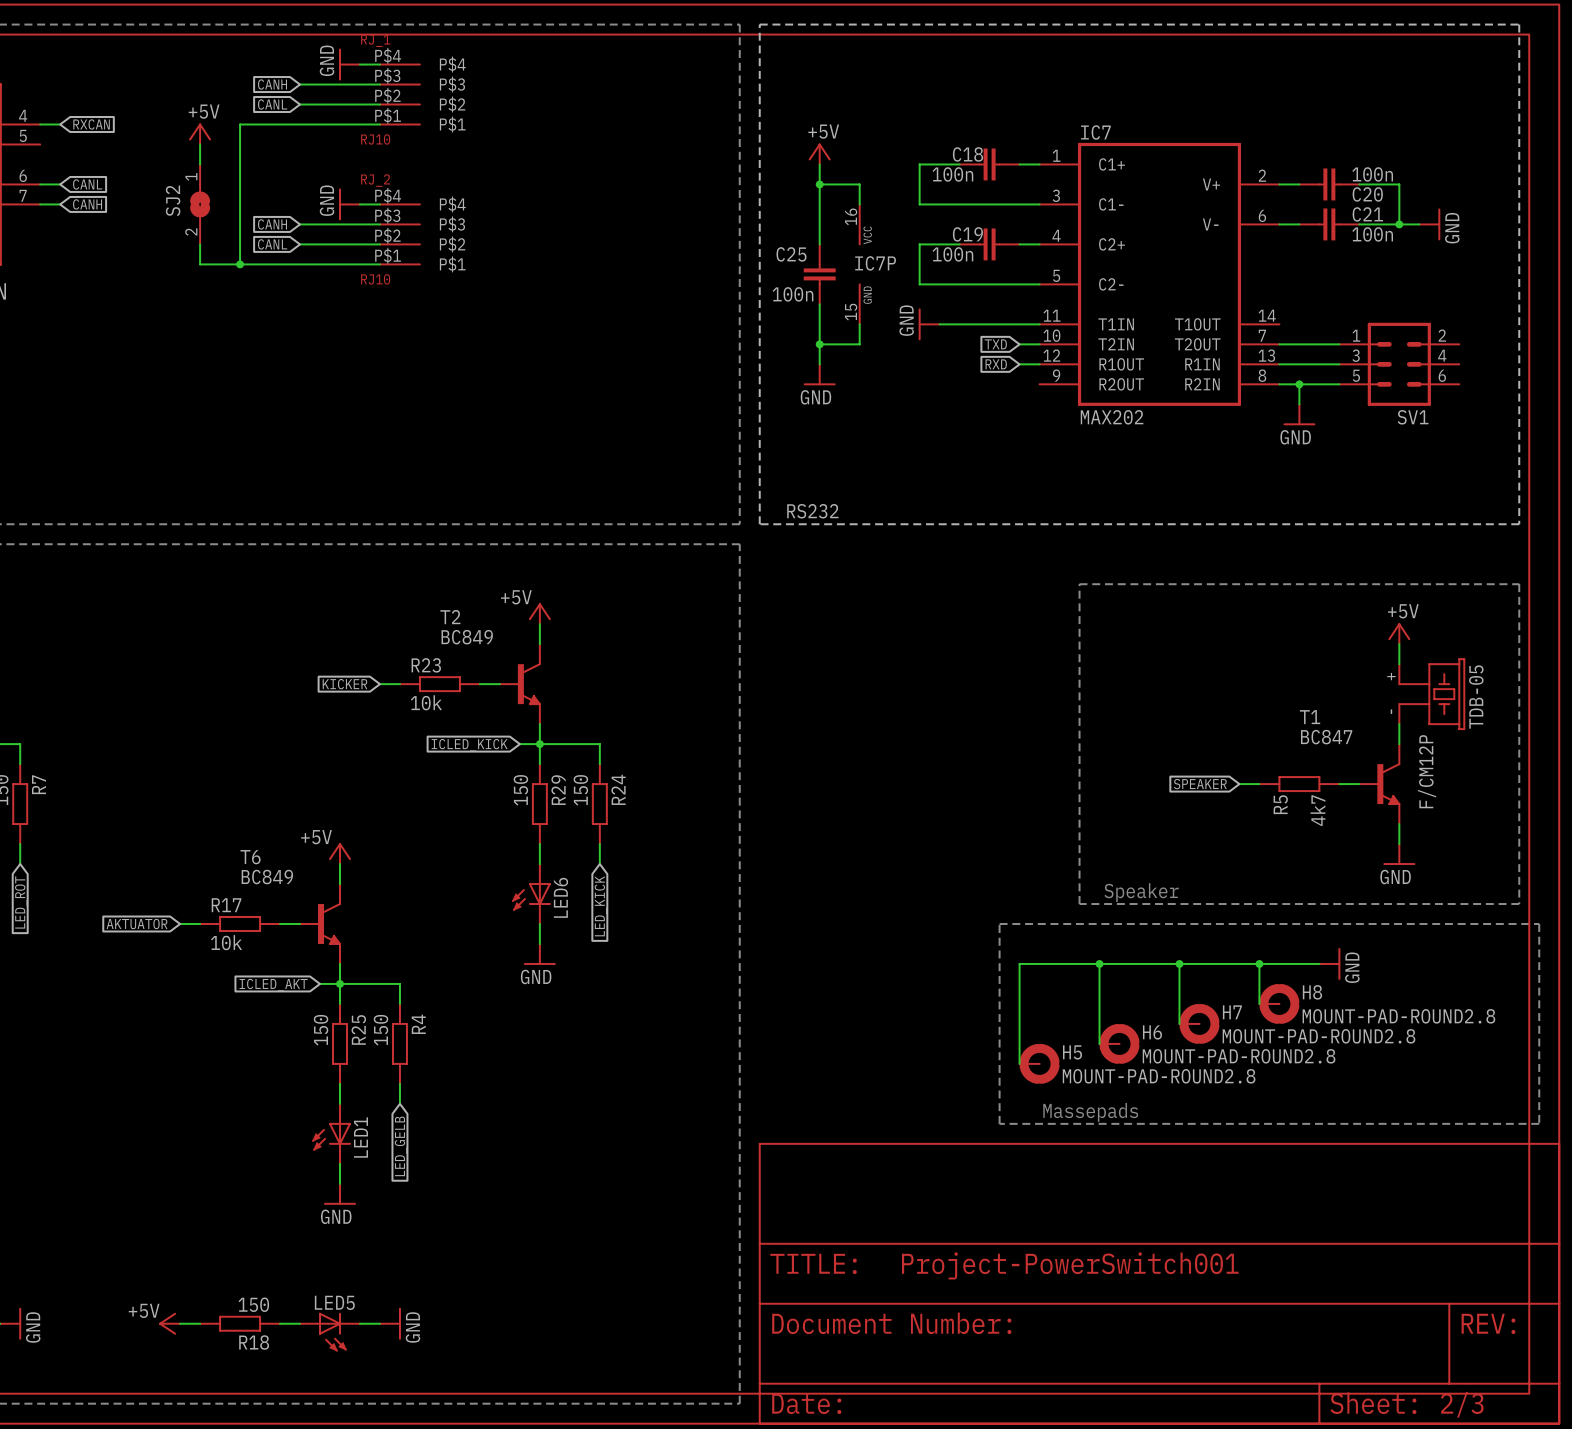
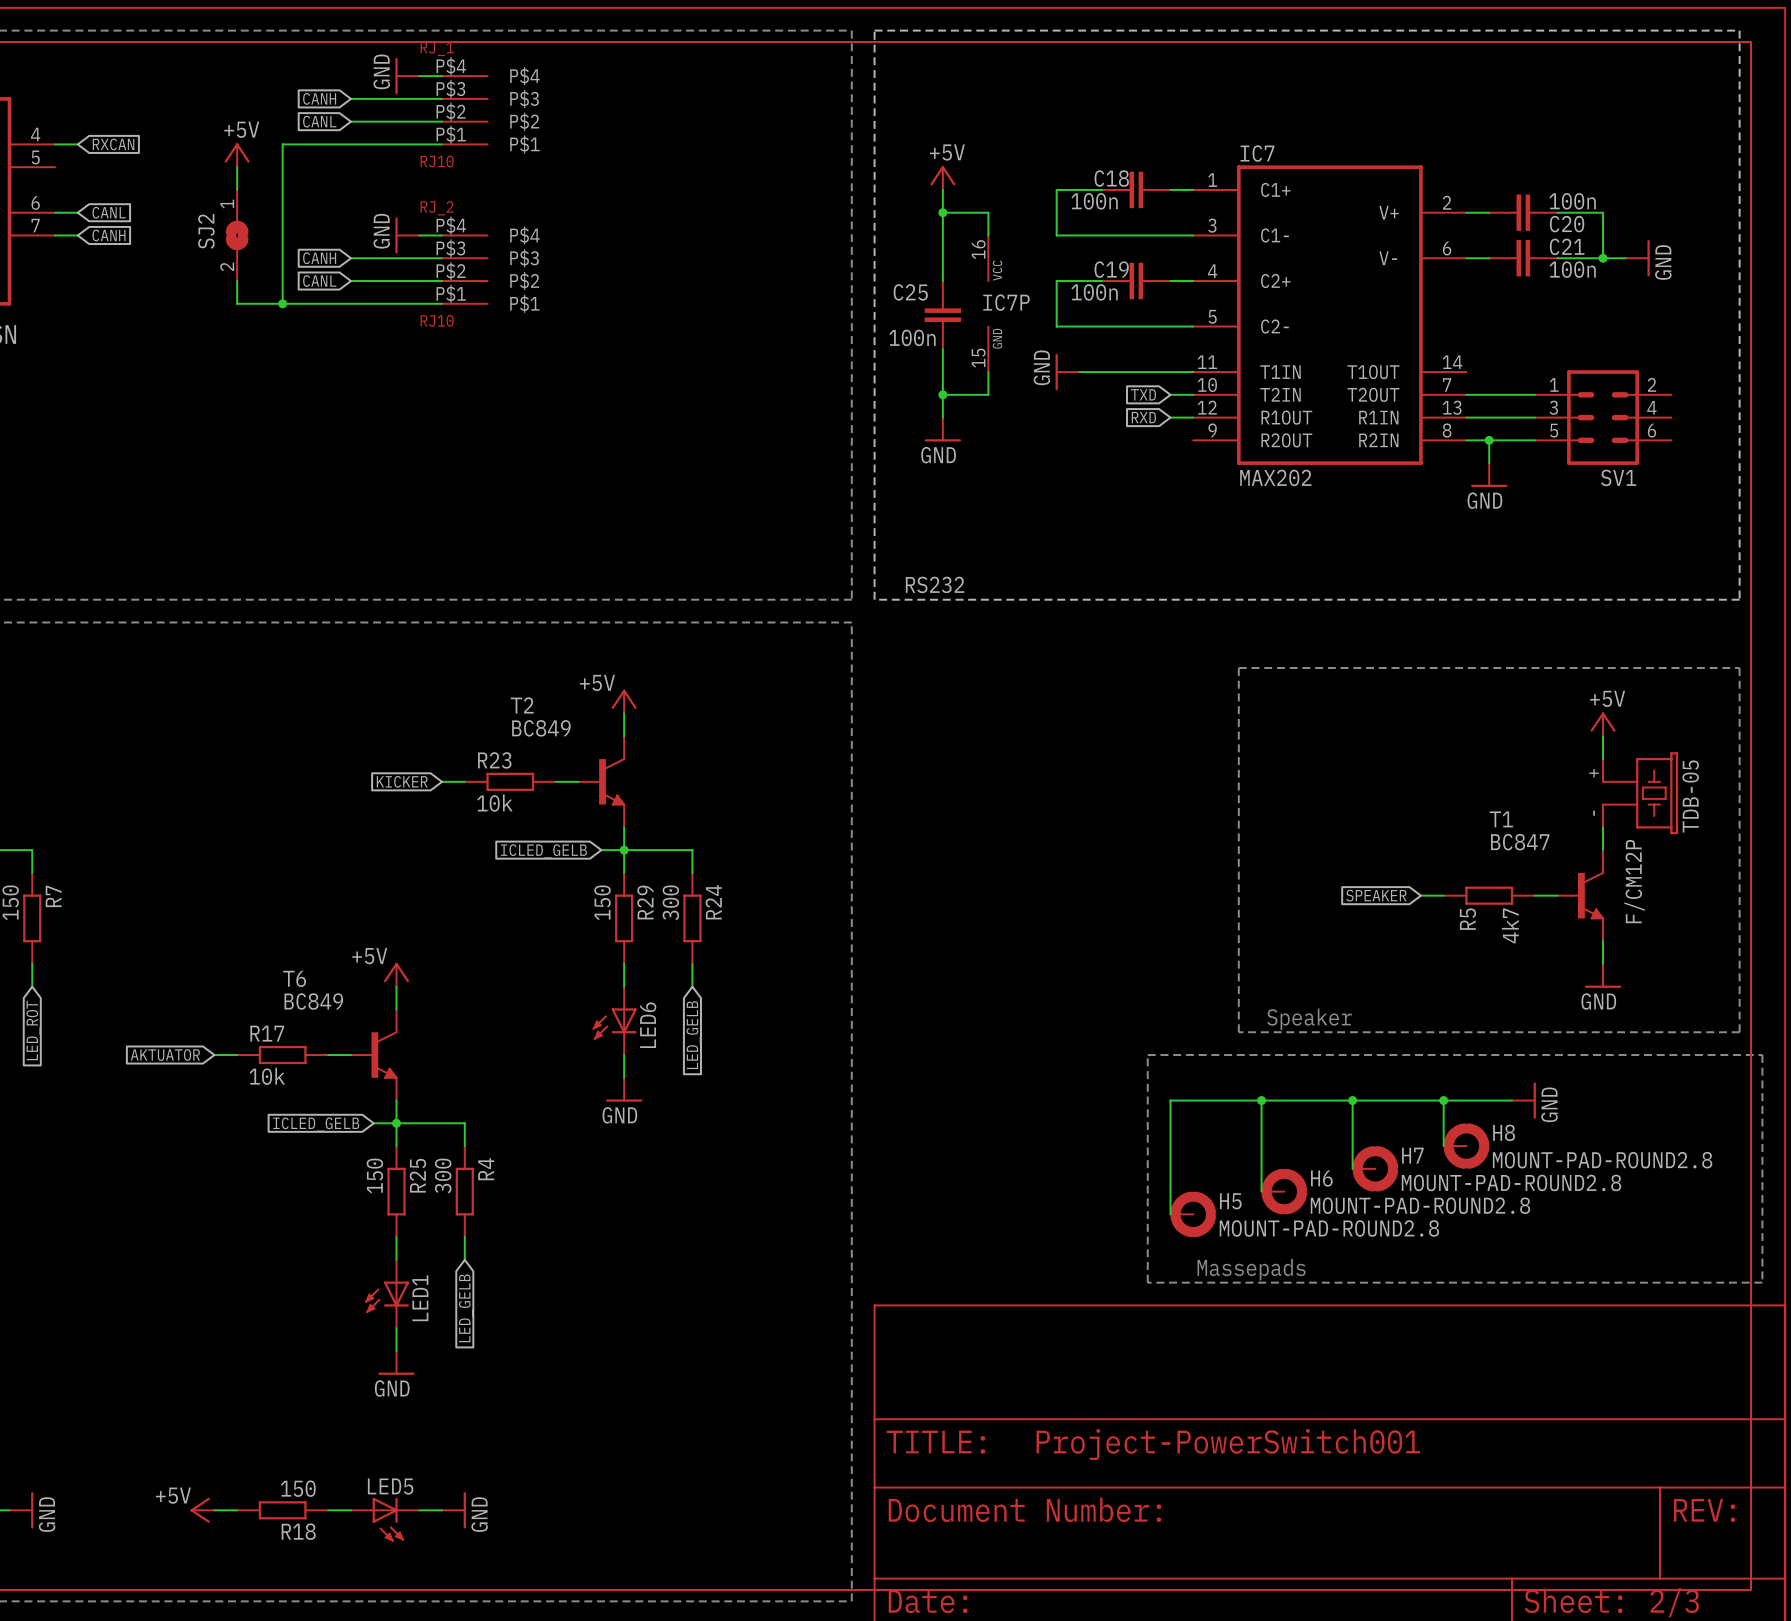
global label: ICLED_KICK (469, 745) -> ICLED_GELB (543, 851)
R24 value: 150 (580, 790) -> 300 (670, 902)
global label: LED_KICK (600, 906) -> LED_GELB (693, 1035)
global label: ICLED_AKT (273, 985) -> ICLED_GELB (316, 1124)
R4 value: 150 (380, 1030) -> 300 (443, 1176)

